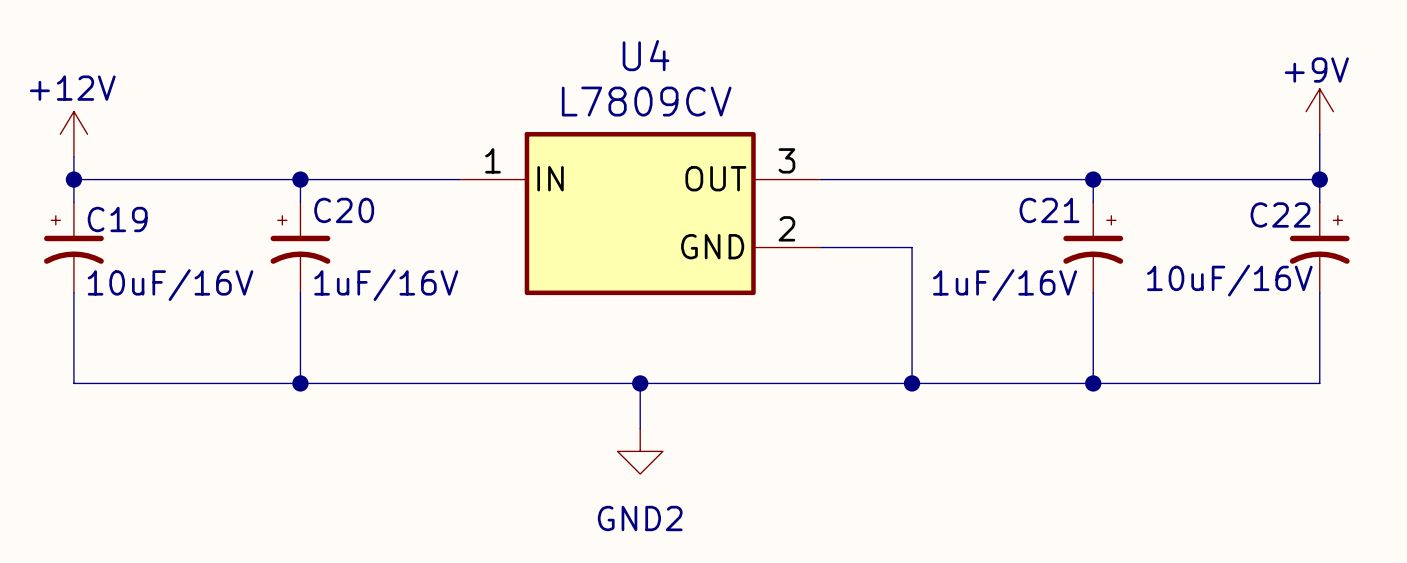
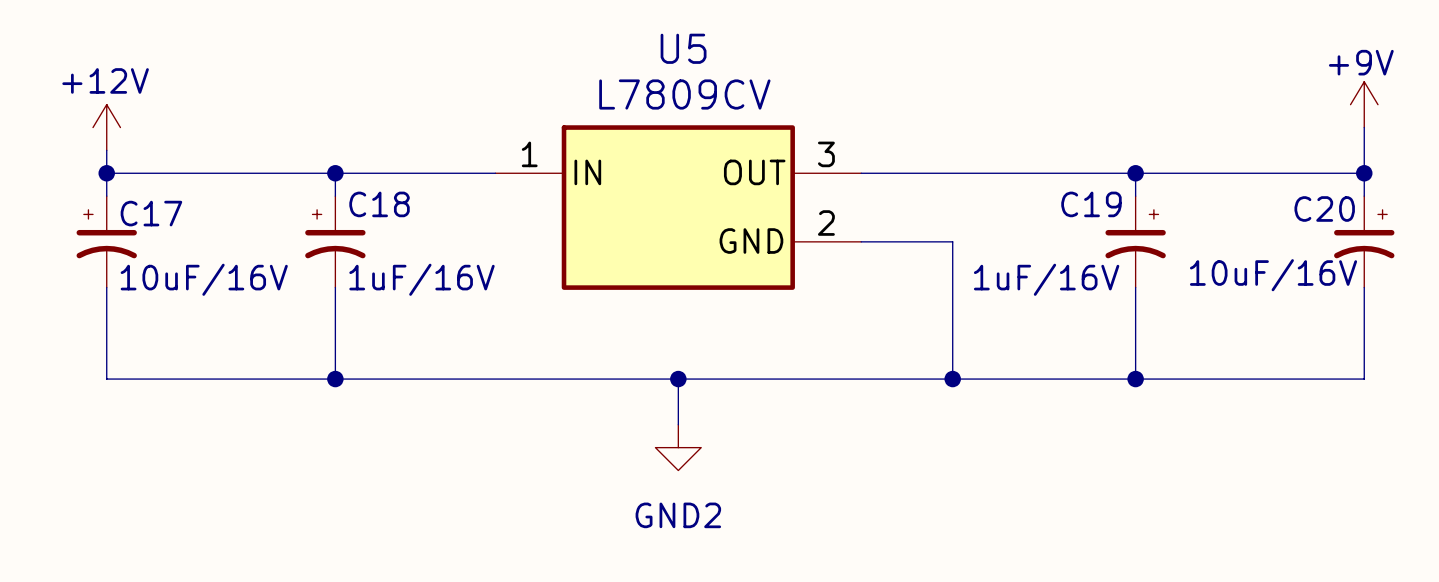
U4 name: U4 (646, 55) -> U5 (683, 48)
C20 name: C20 (344, 210) -> C18 (379, 204)
C21 name: C21 (1049, 210) -> C19 (1091, 204)
C22 name: C22 (1280, 214) -> C20 (1324, 208)
C19 name: C19 (117, 219) -> C17 (151, 213)

